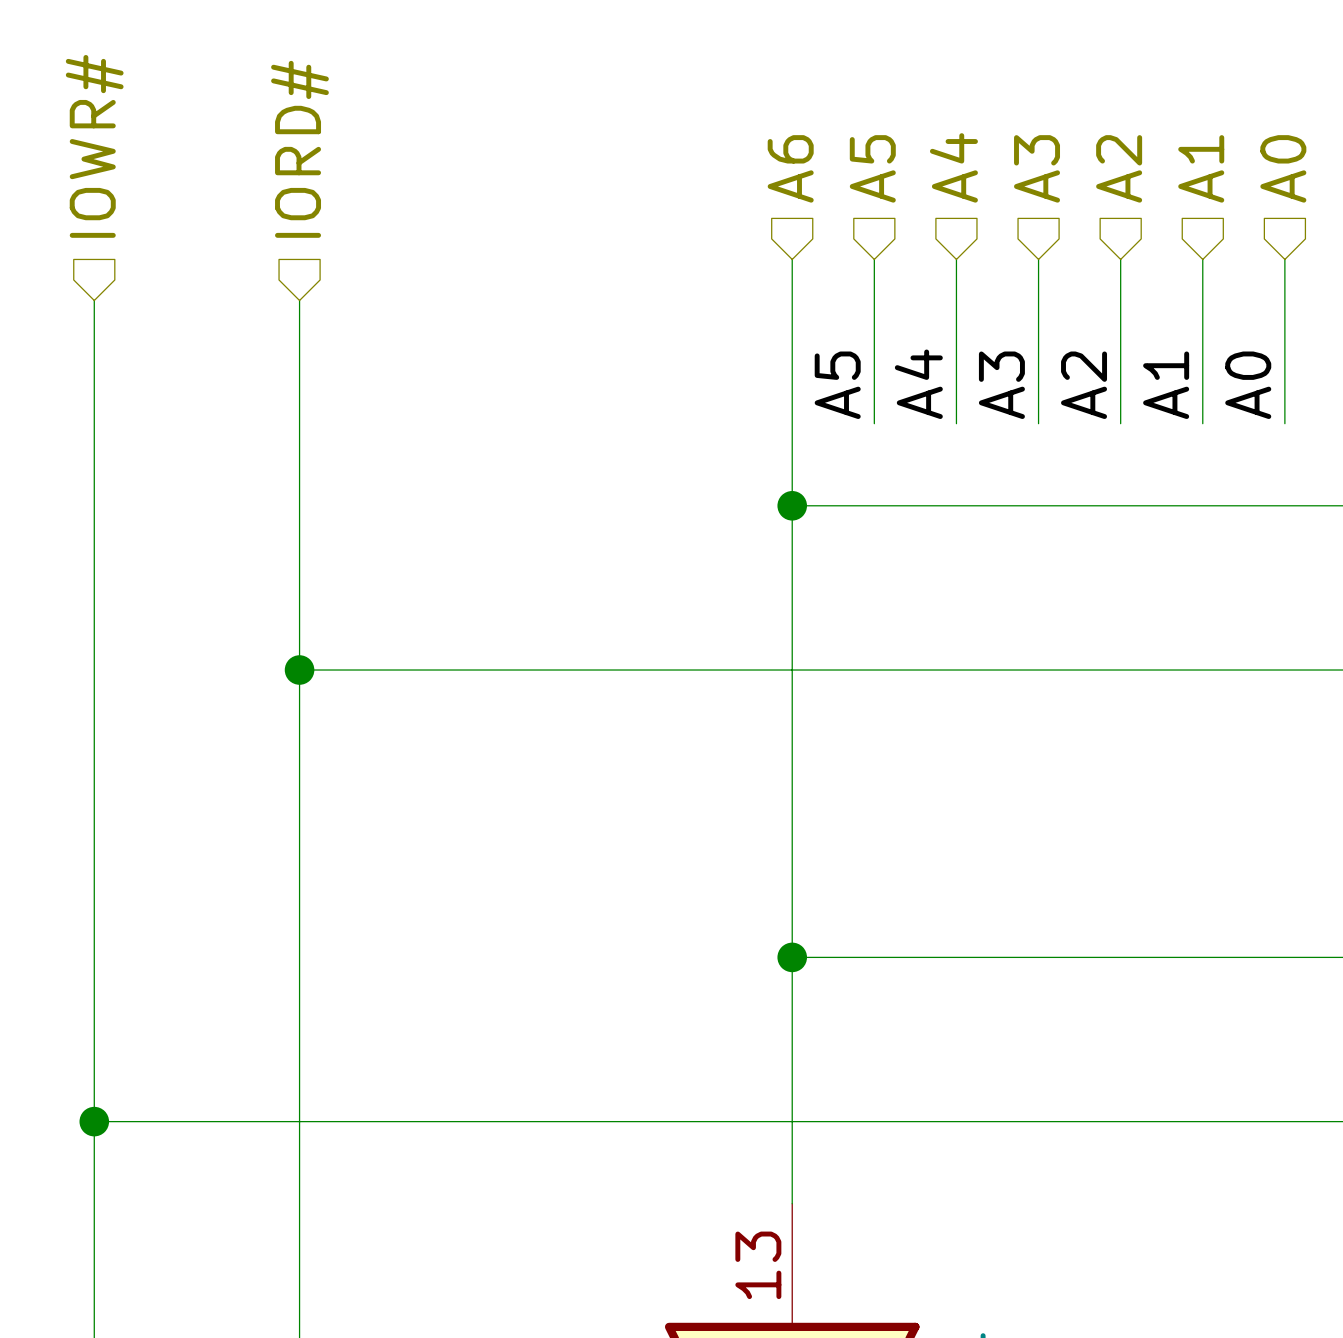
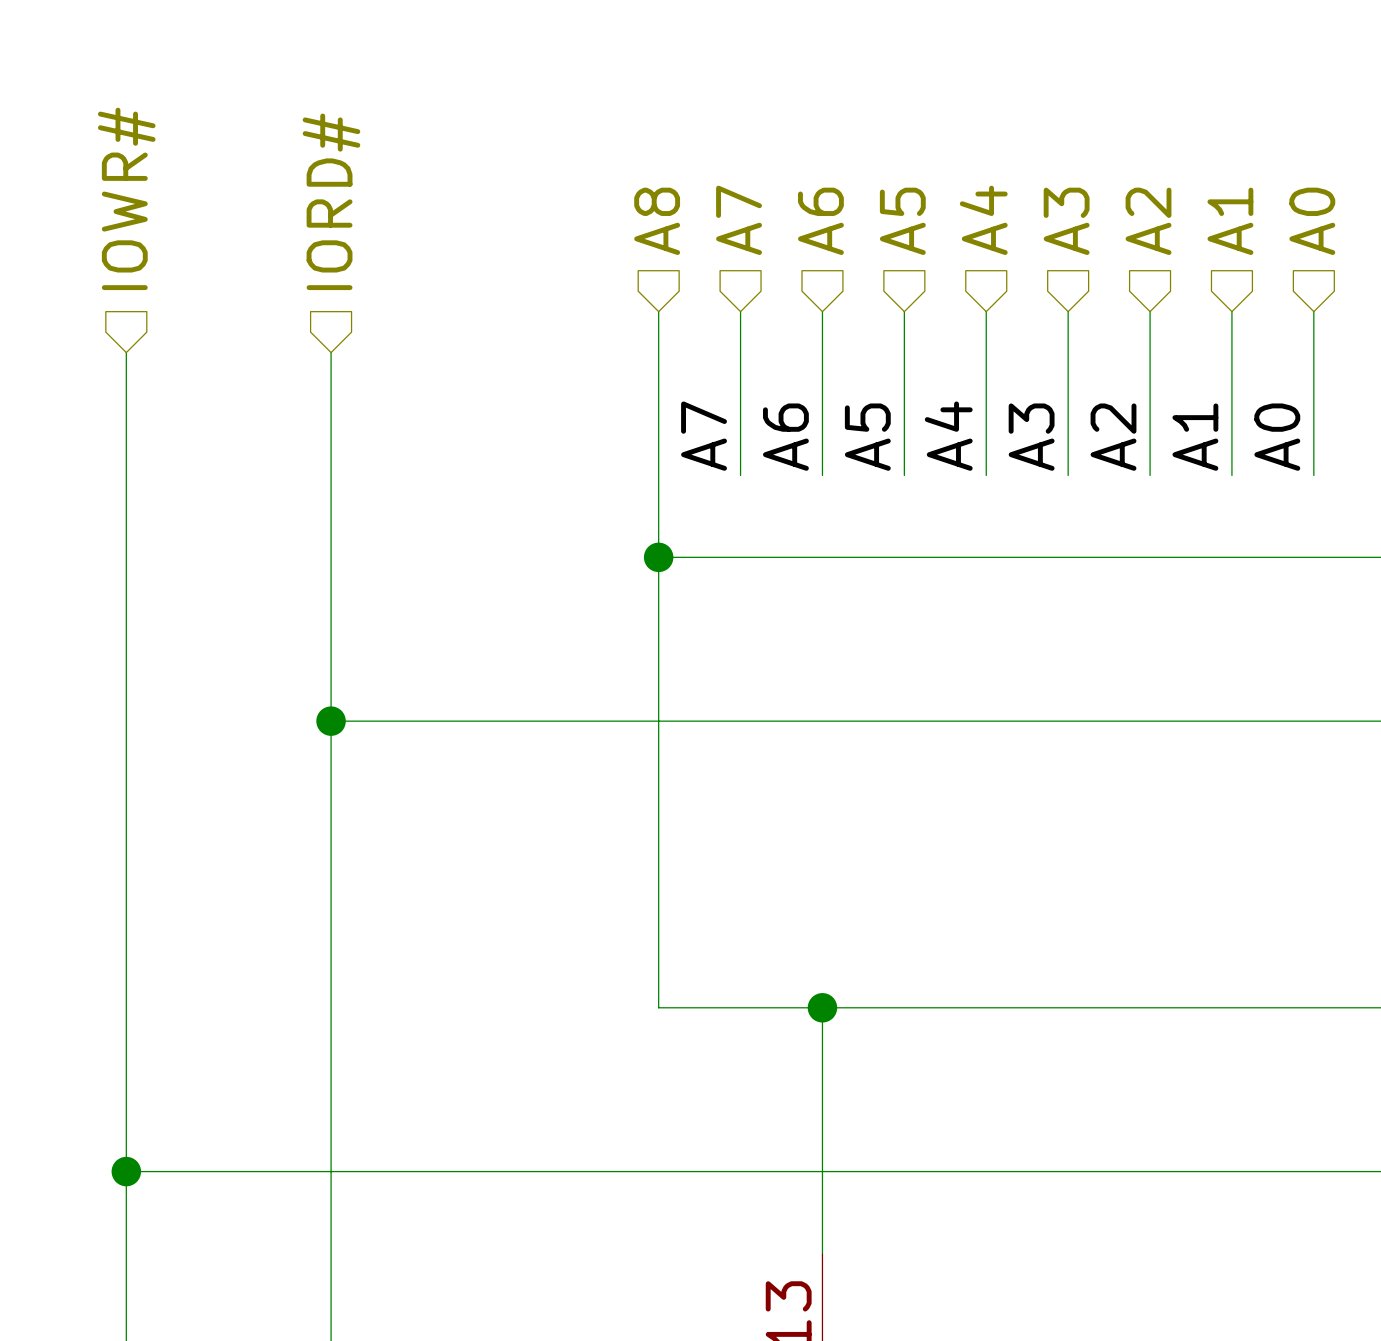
hierarchical label: none -> A7 (739, 220)
hierarchical label: none -> A8 (657, 221)
wire: none -> (740, 311) (740, 475)
label: none -> A7 (704, 436)
label: none -> A6 (785, 437)
wire: (792, 423) (792, 957) -> (658, 311) (658, 1007) (822, 1007)
wire: none -> (658, 557) (822, 557)
junction position: (792, 505) -> (658, 557)

